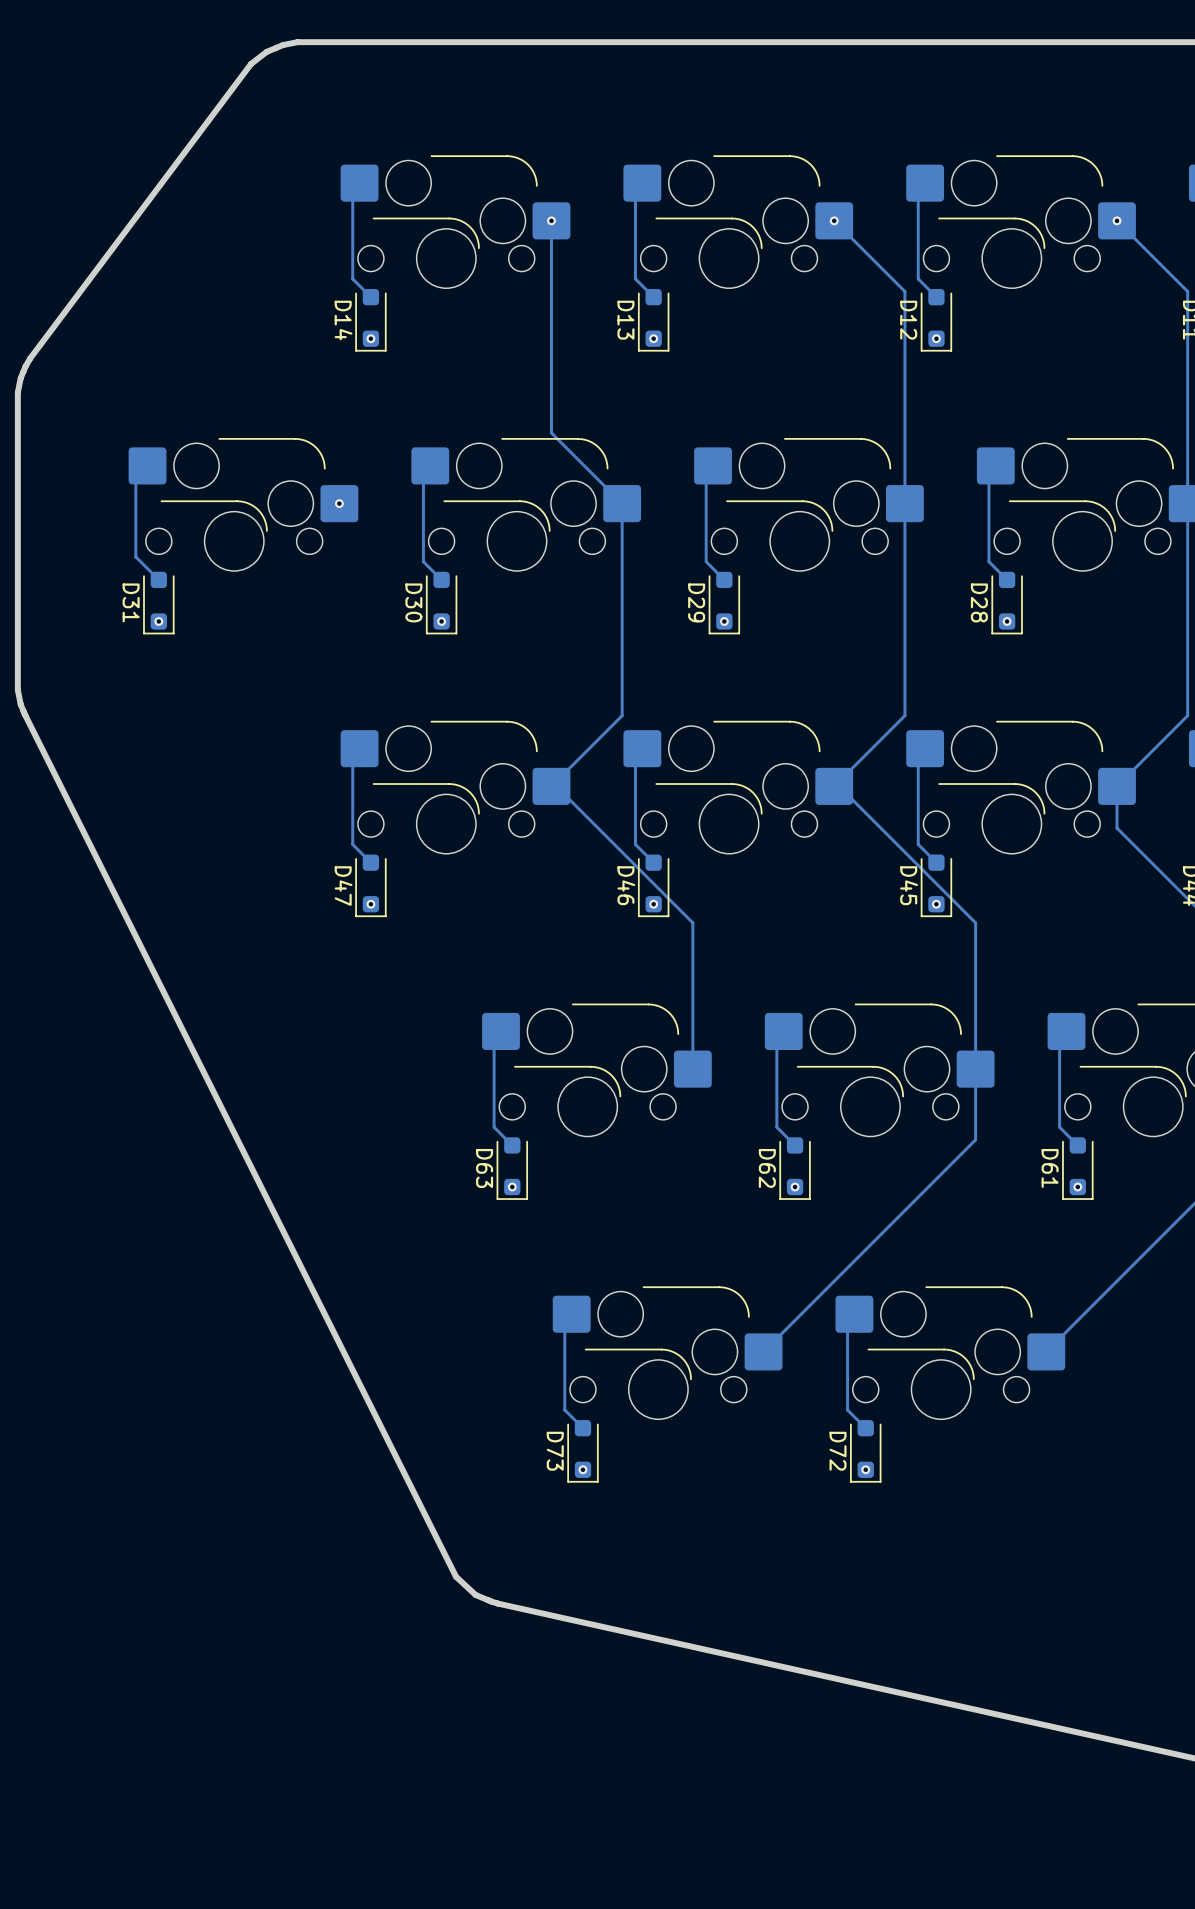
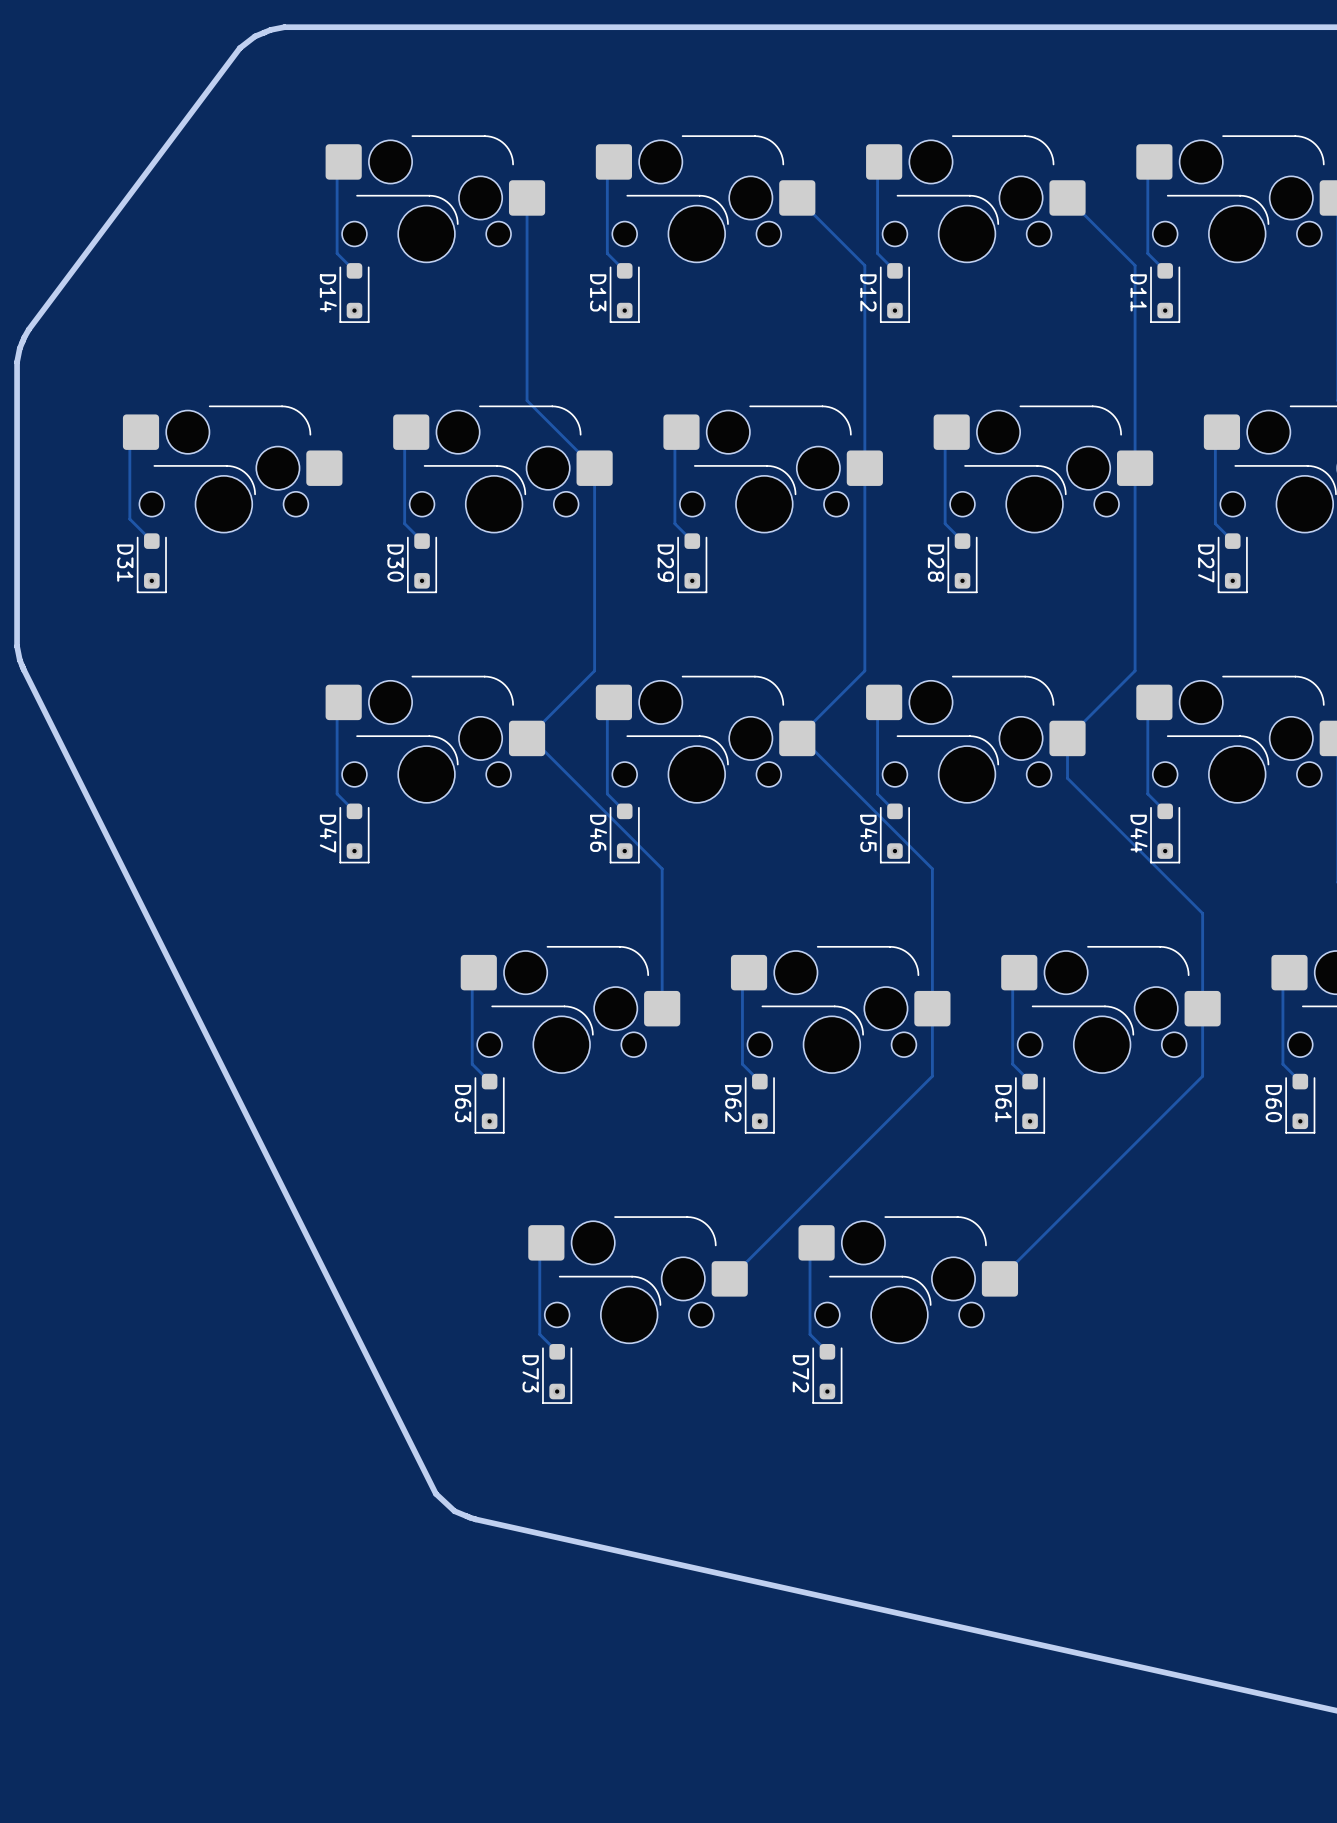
via: (551, 220) -> none
via: (834, 220) -> none
via: (1117, 220) -> none
via: (339, 503) -> none

